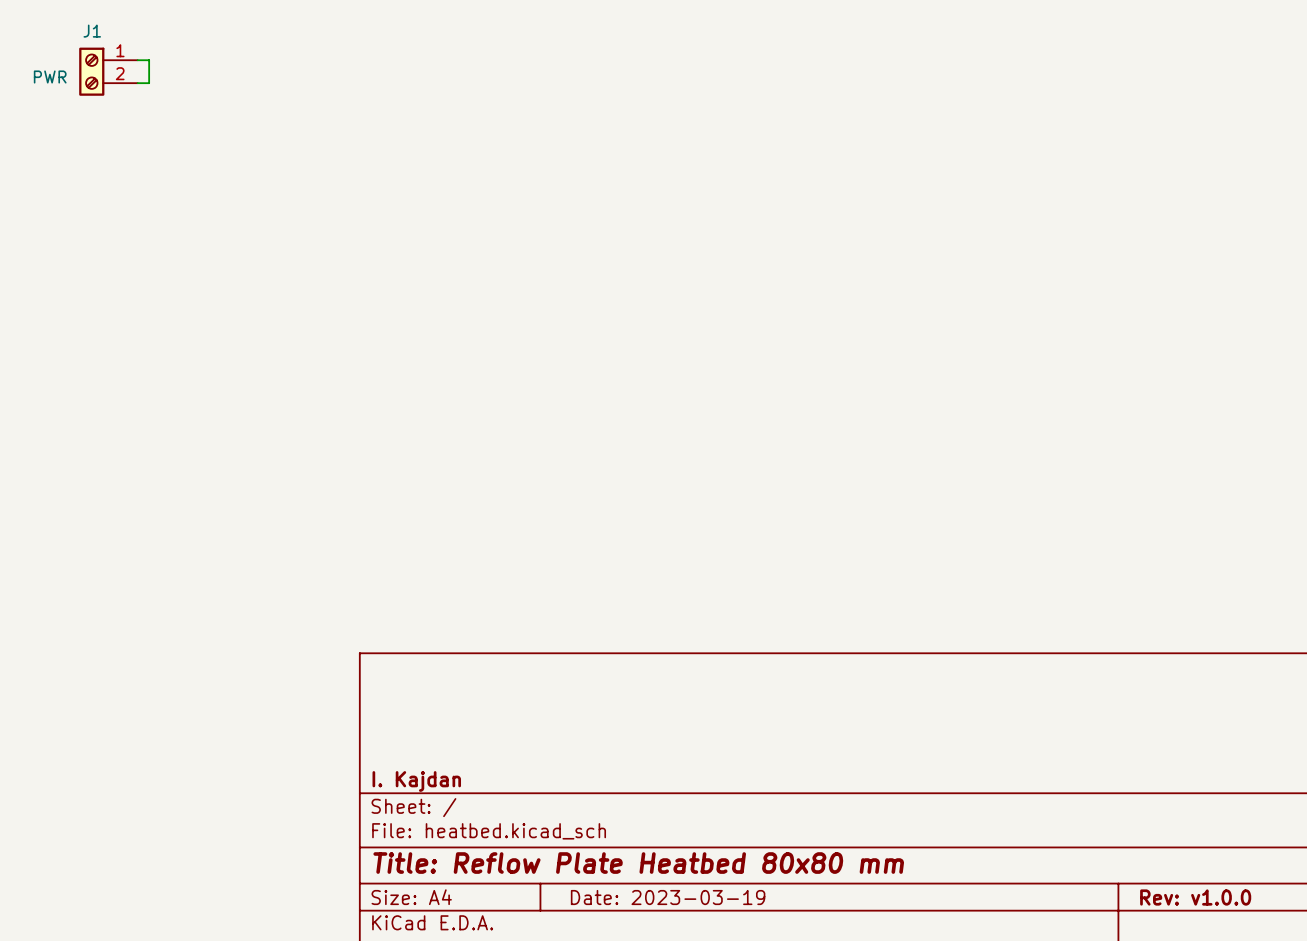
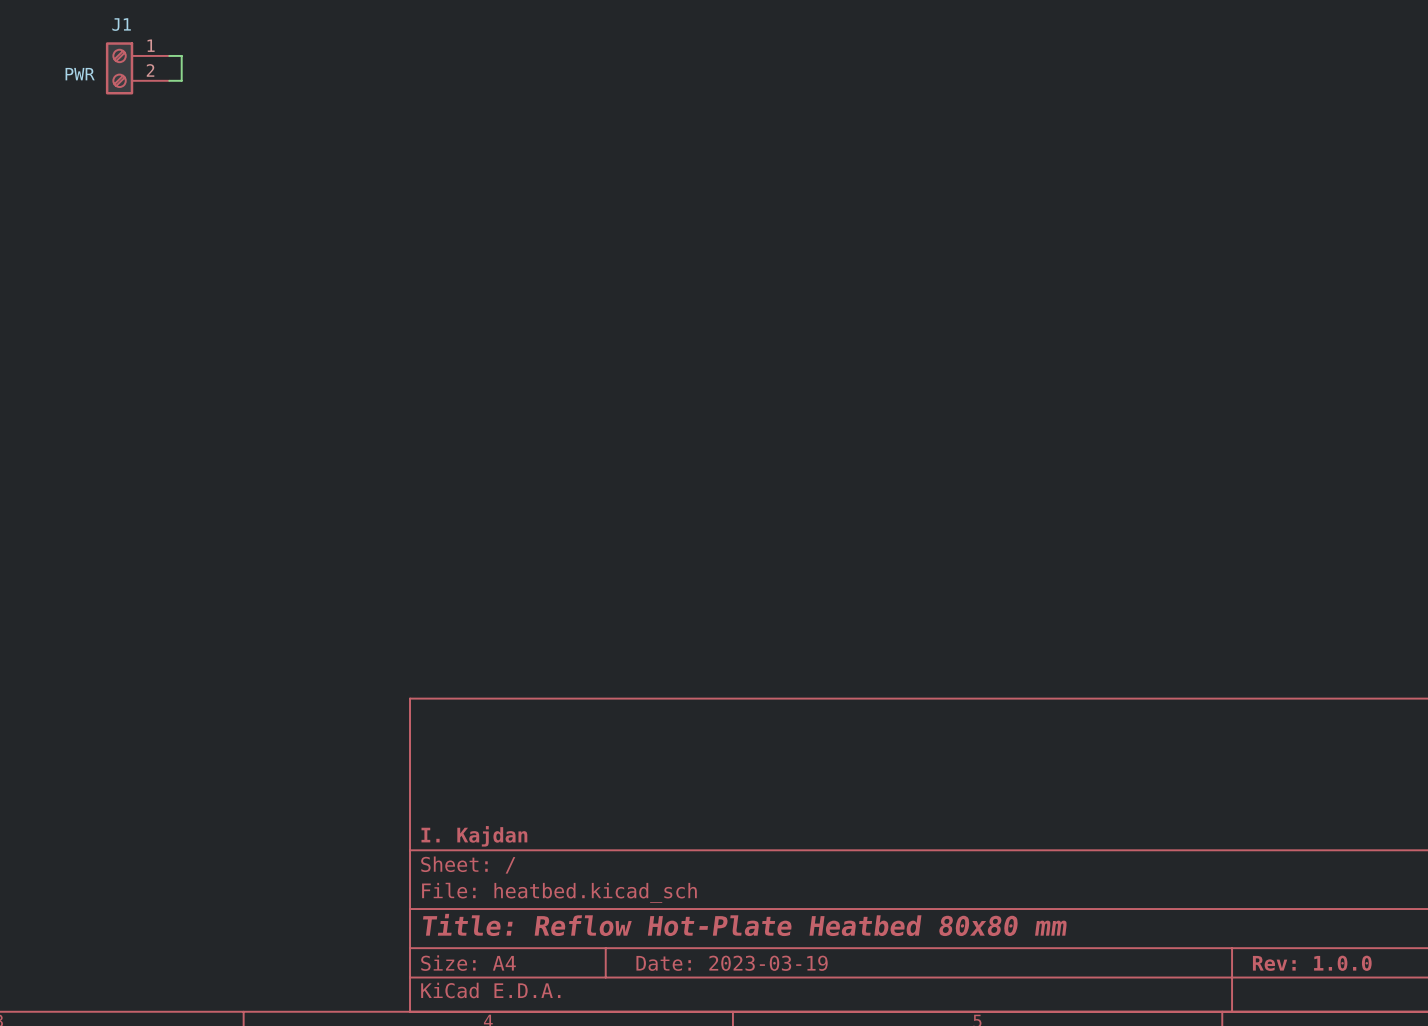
title block: Title: Reflow Plate Heatbed 80x80 mm (638, 863) -> Title: Reflow Hot-Plate Heatbed 80x80 mm (744, 924)
title block: Rev: v1.0.0 (1195, 897) -> Rev: 1.0.0 (1312, 963)

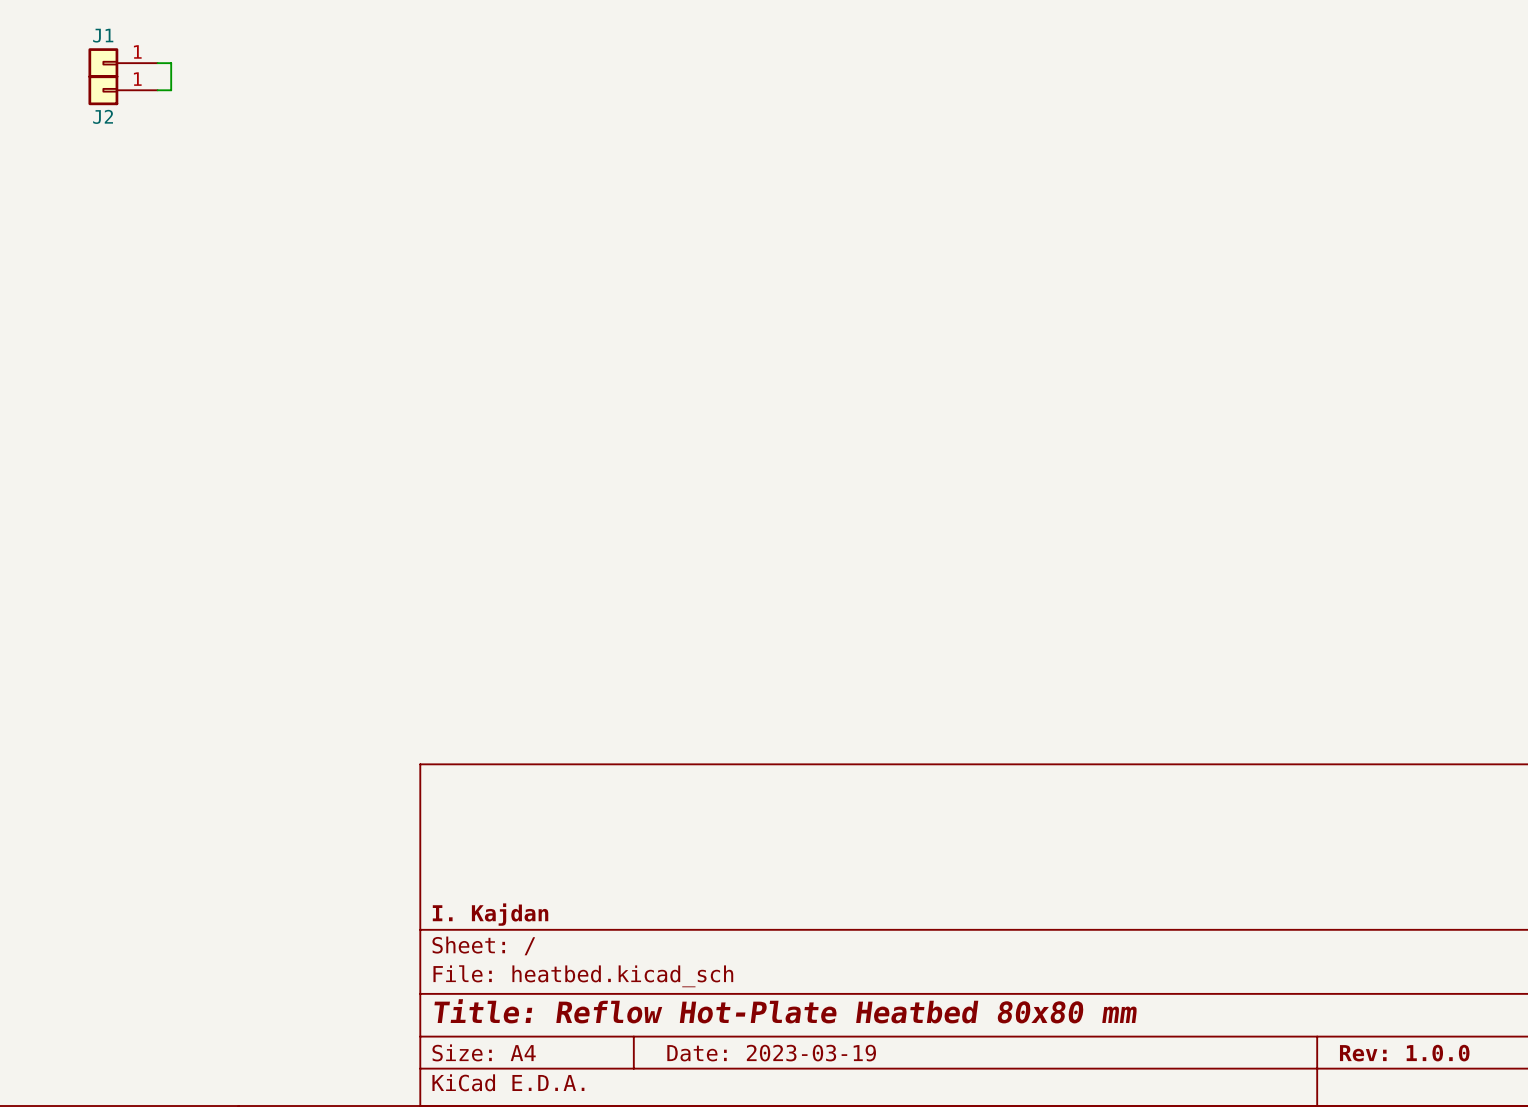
J1 symbol: [105, 42, 170, 95] -> [88, 48, 158, 79]
J1 value: PWR (80, 74) -> none
J2: none -> (123, 90)

